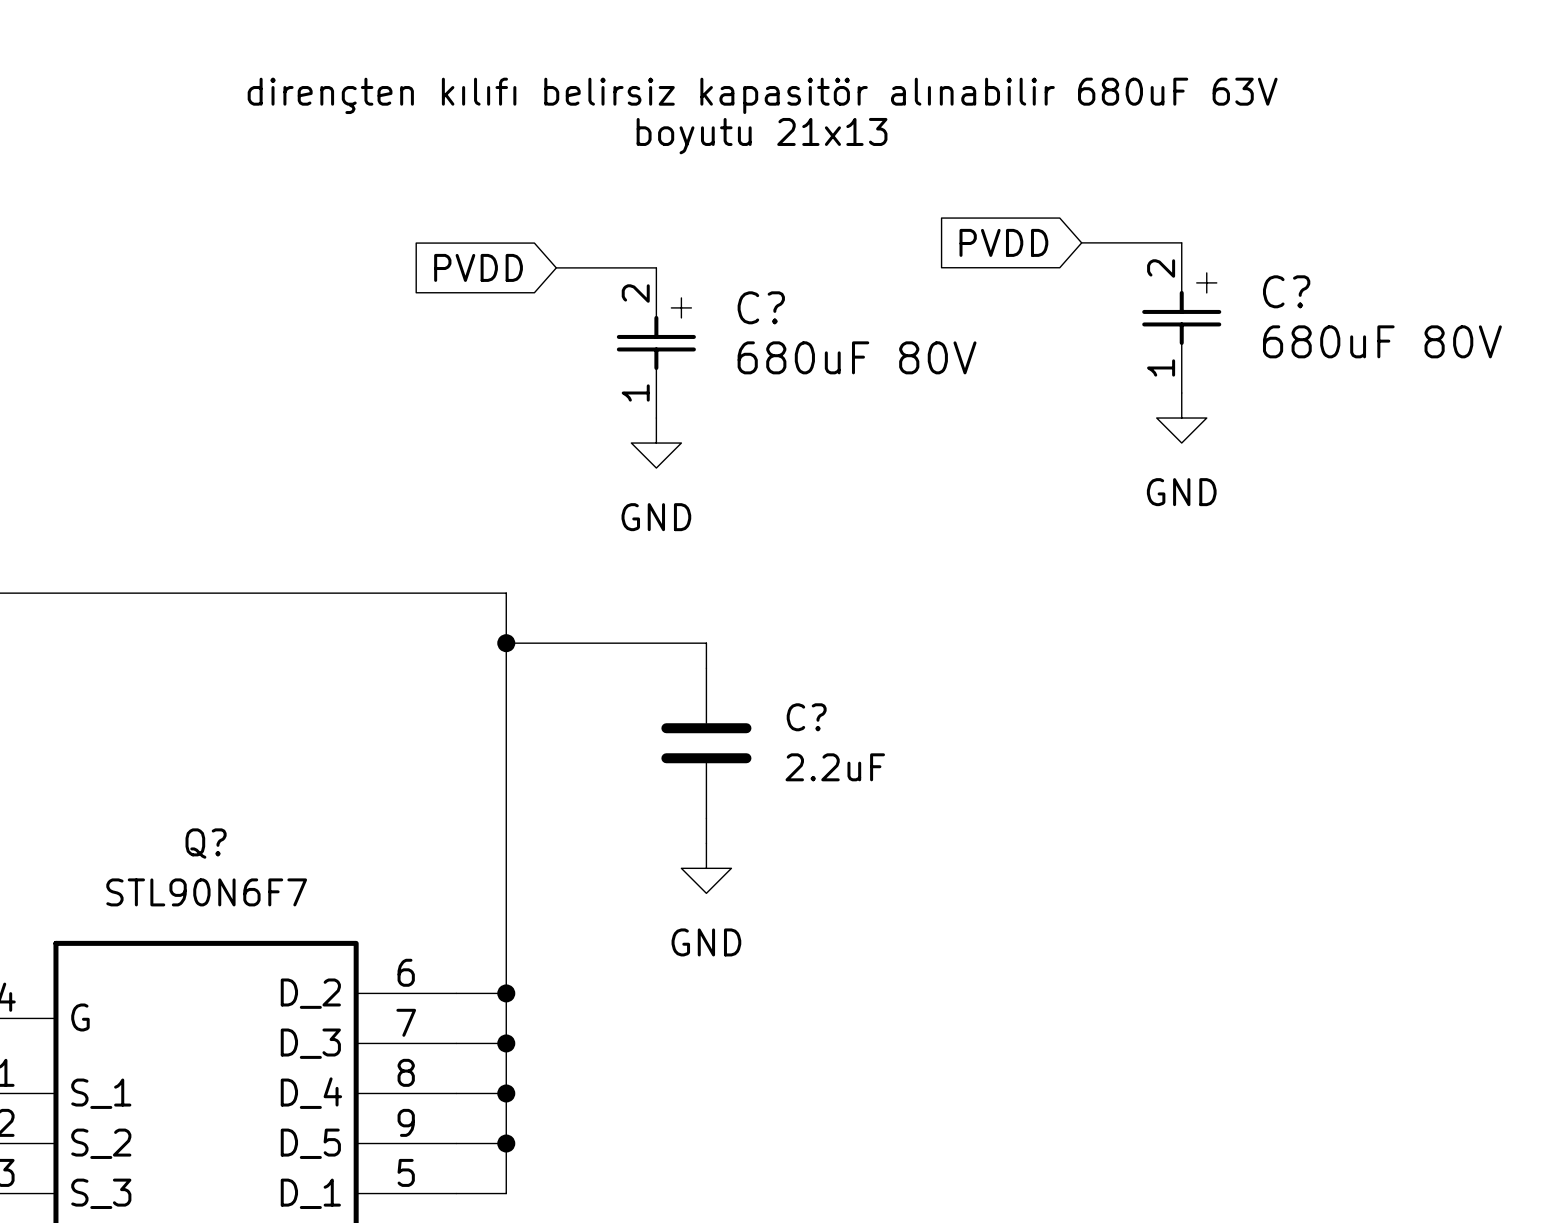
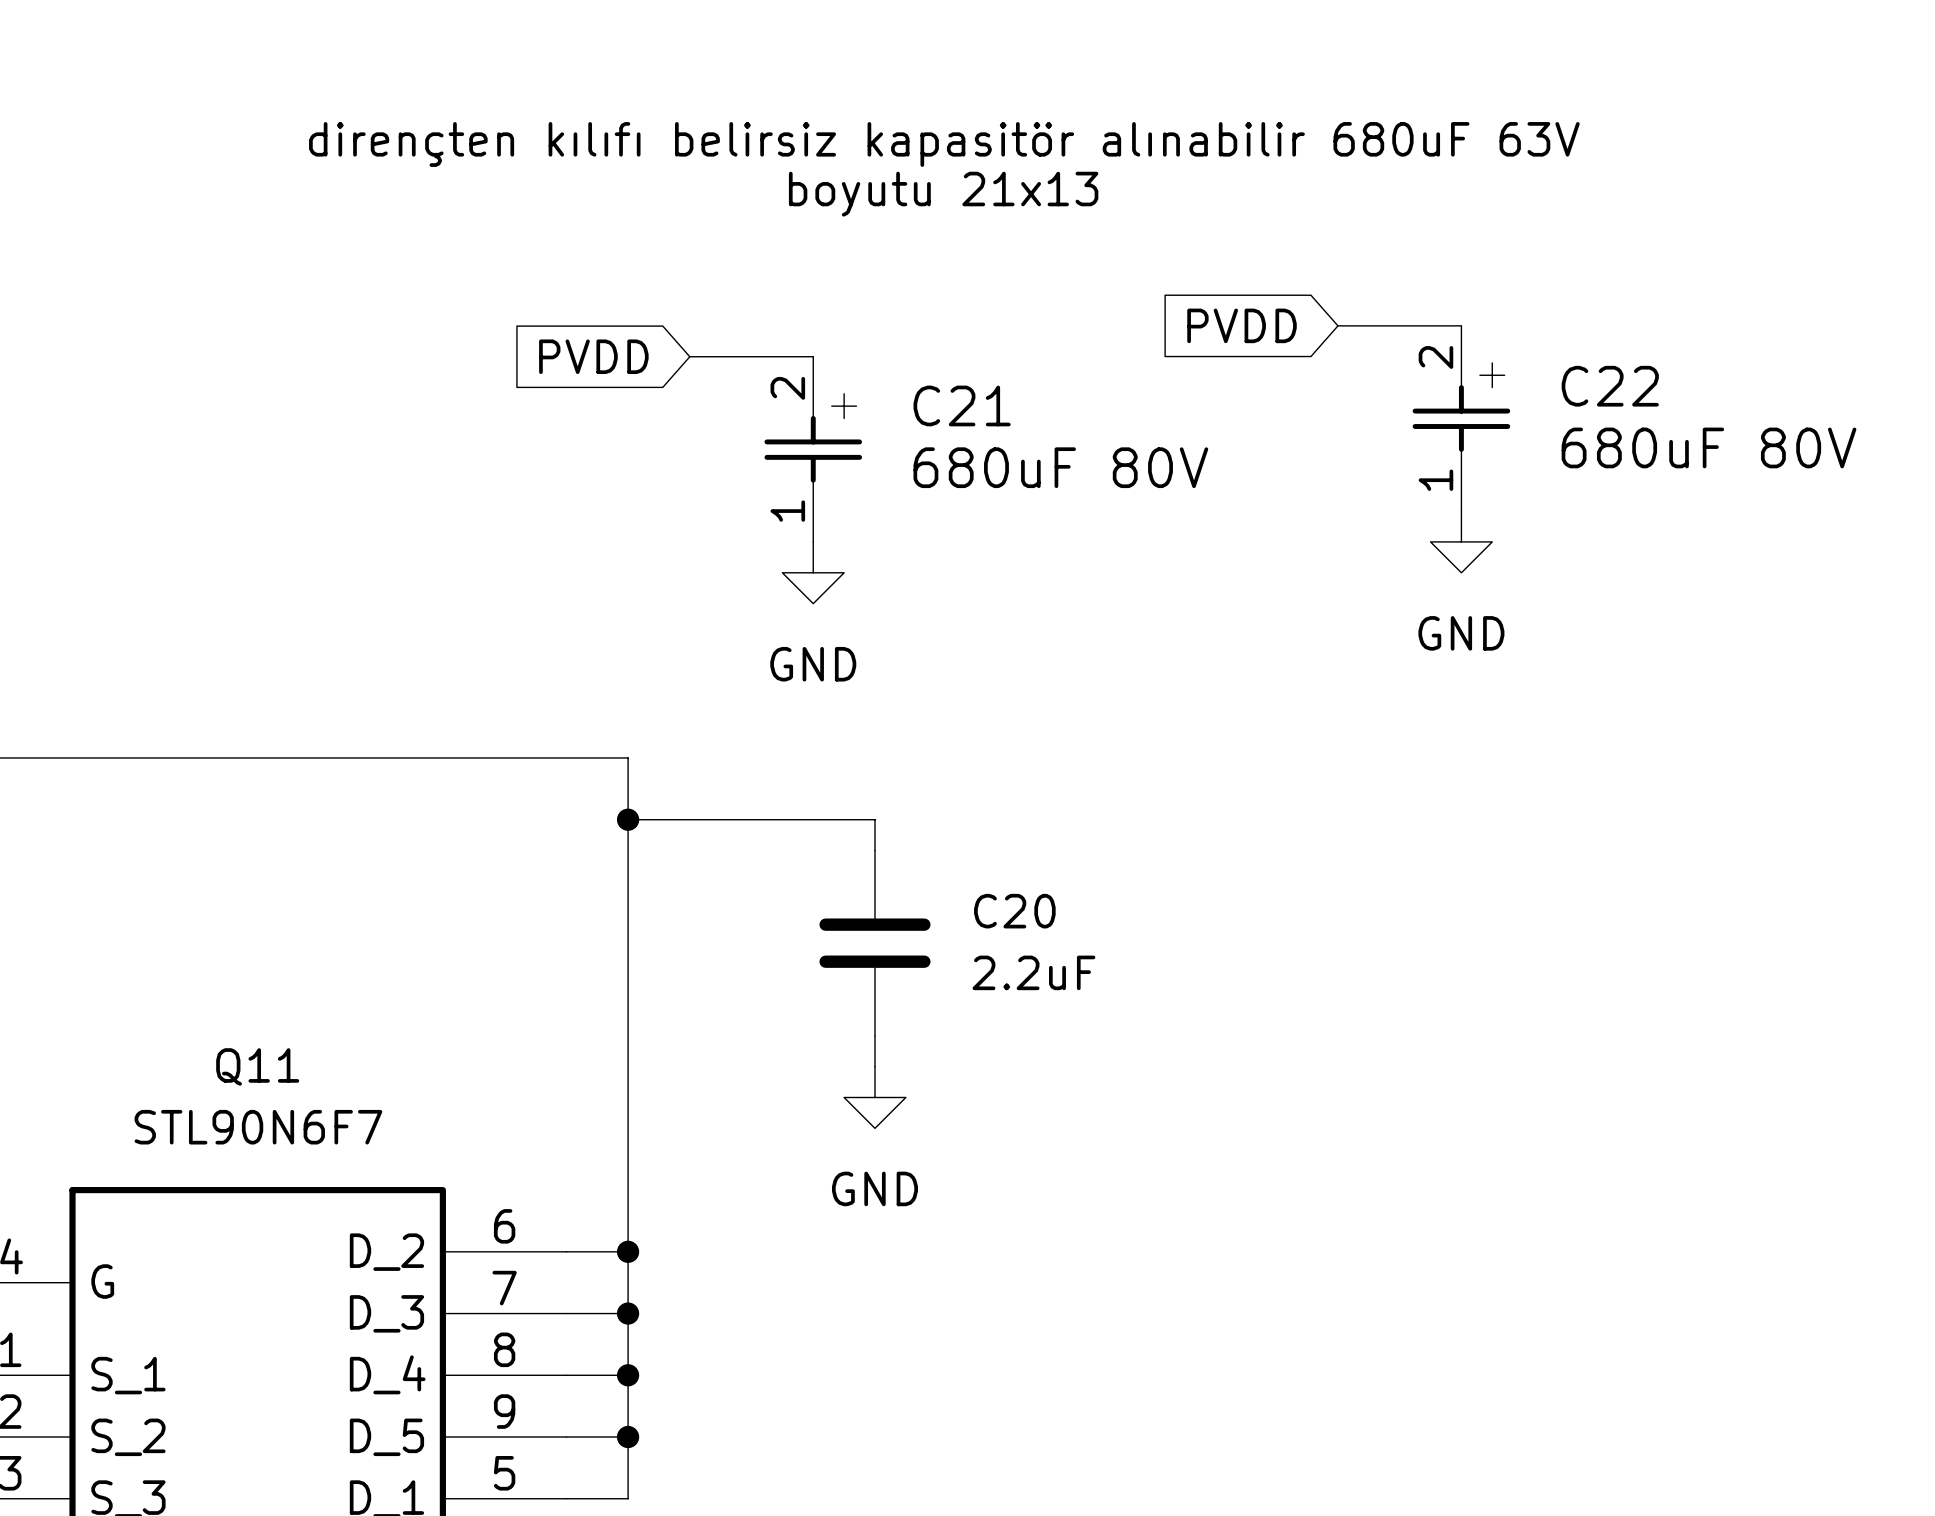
C? name: C? (1286, 291) -> C22 (1610, 386)
C? name: C? (761, 307) -> C21 (962, 405)
C? name: C? (806, 717) -> C20 (1014, 911)
Q? name: Q? (206, 843) -> Q11 (257, 1066)

